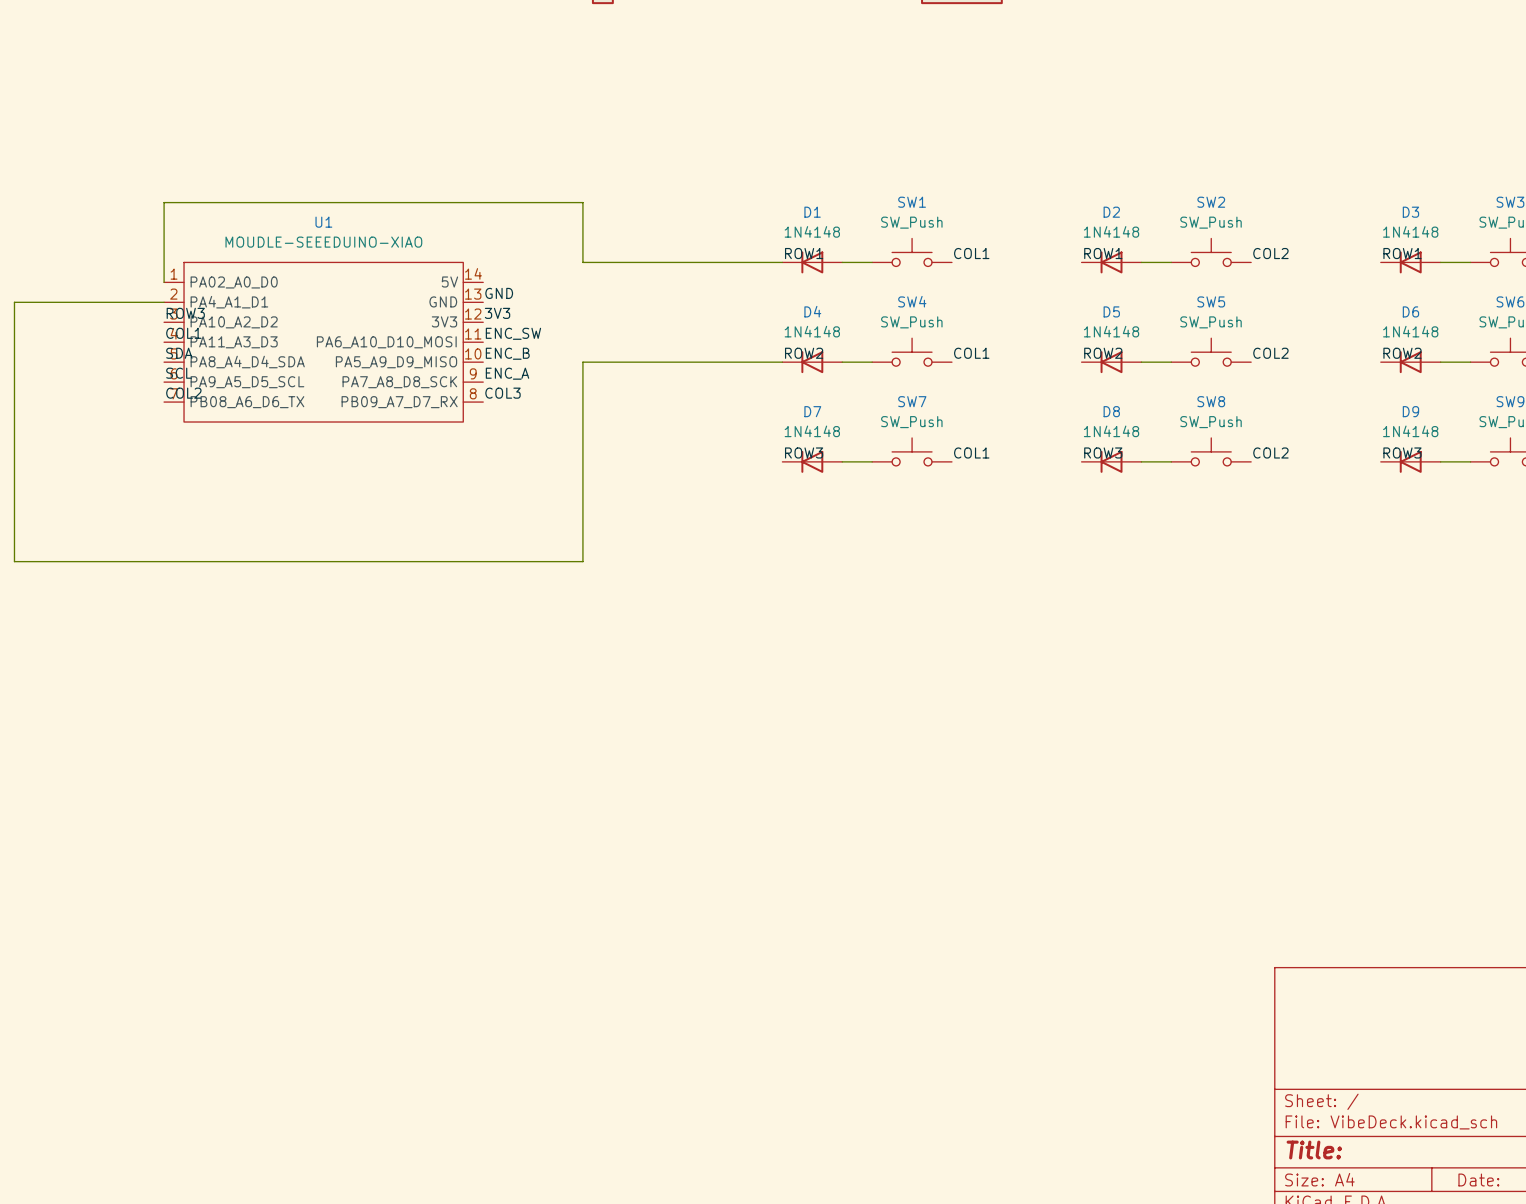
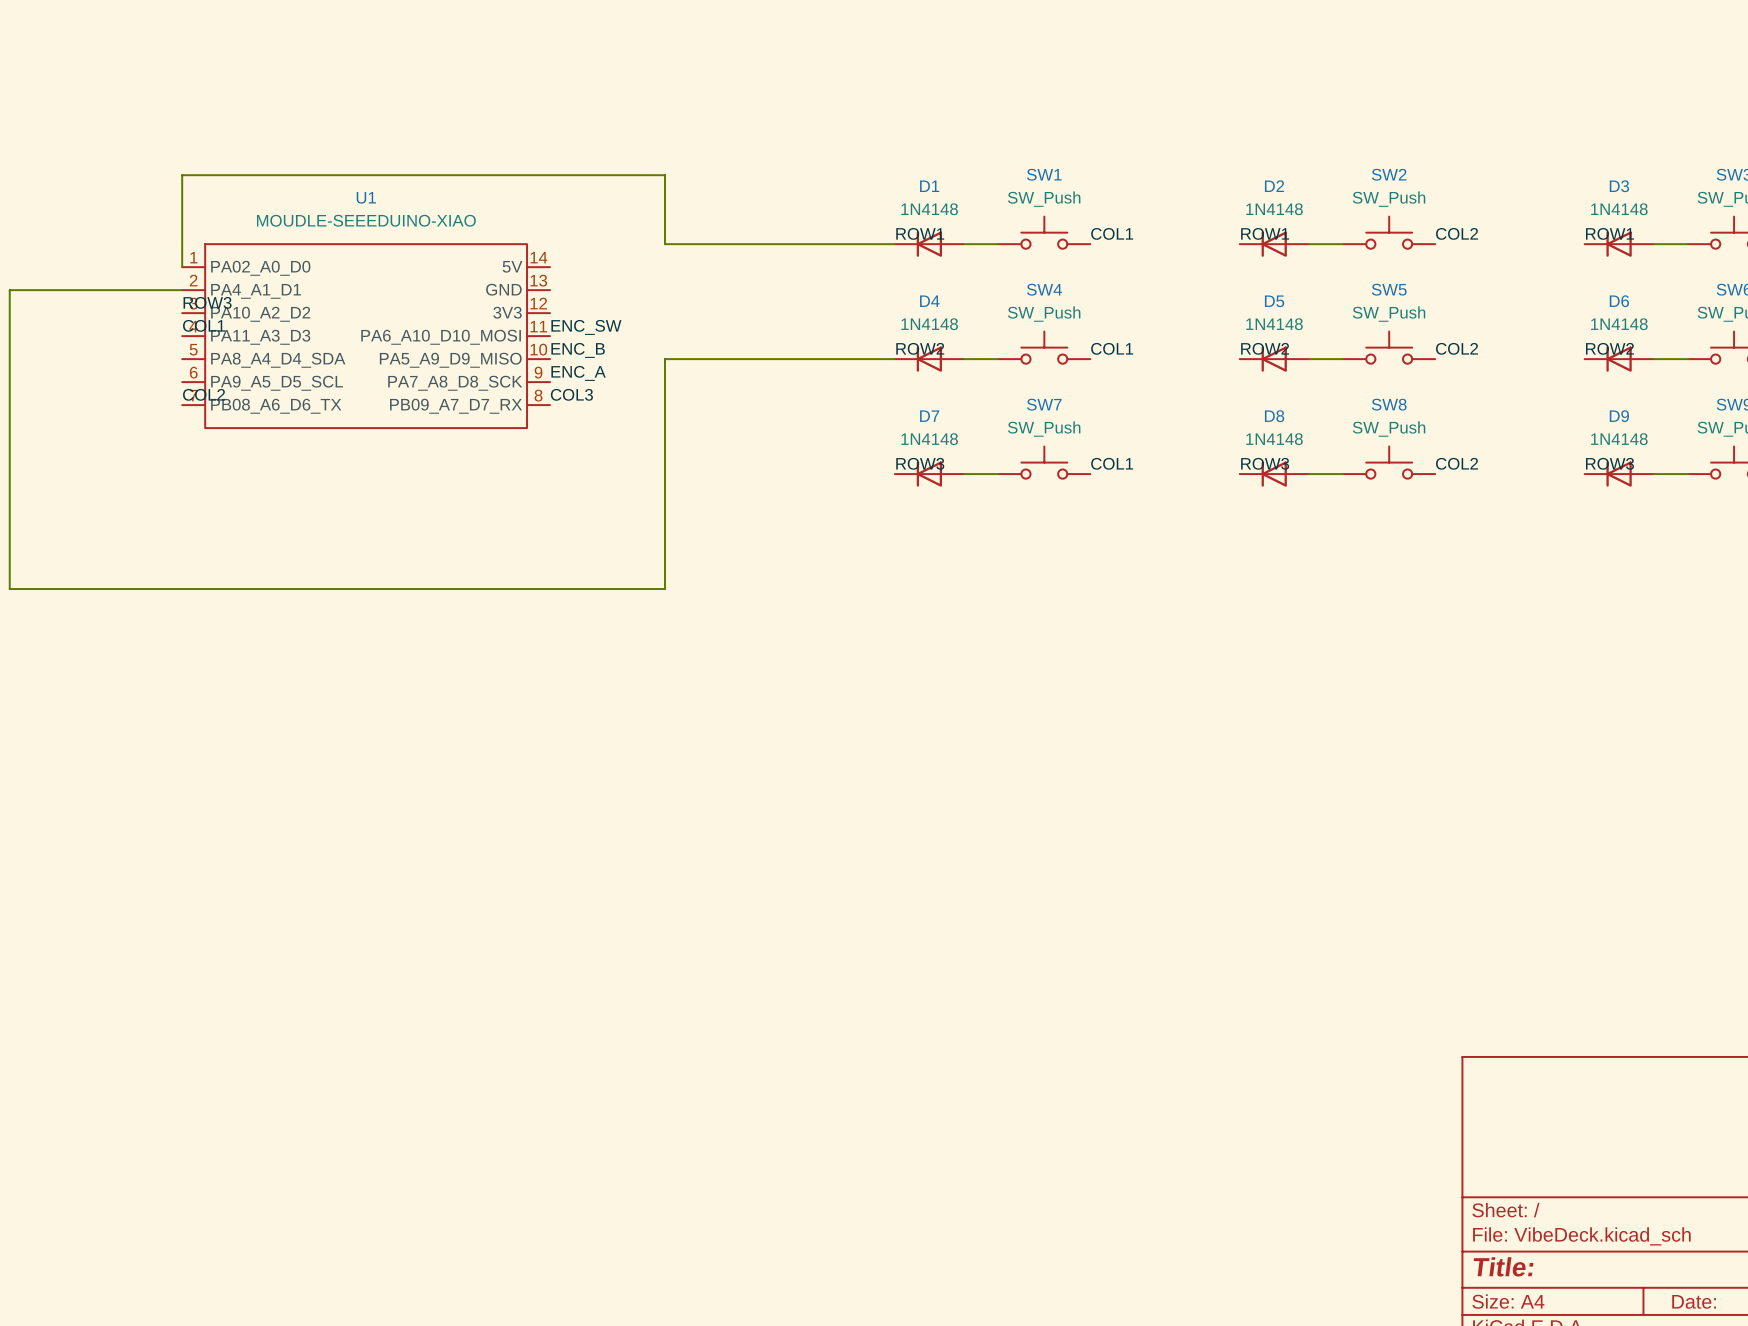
label: GND (499, 293) -> none
label: 3V3 (497, 313) -> none
label: SDA (179, 353) -> none
label: SCL (179, 373) -> none

